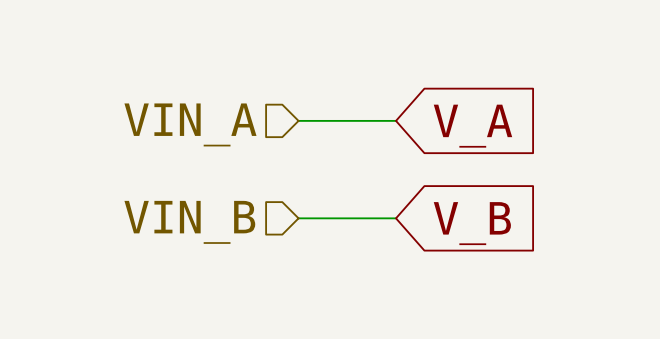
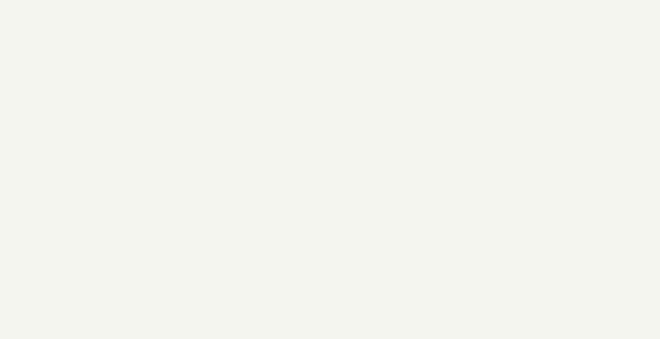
wire: (298, 120) (396, 120) -> none
hierarchical label: VIN_A (190, 124) -> none
global label: V_A (472, 126) -> none
wire: (298, 218) (396, 218) -> none
hierarchical label: VIN_B (189, 222) -> none
global label: V_B (472, 223) -> none

